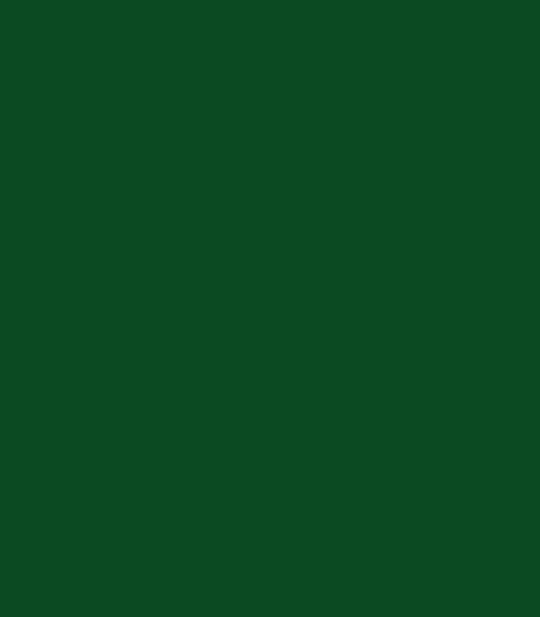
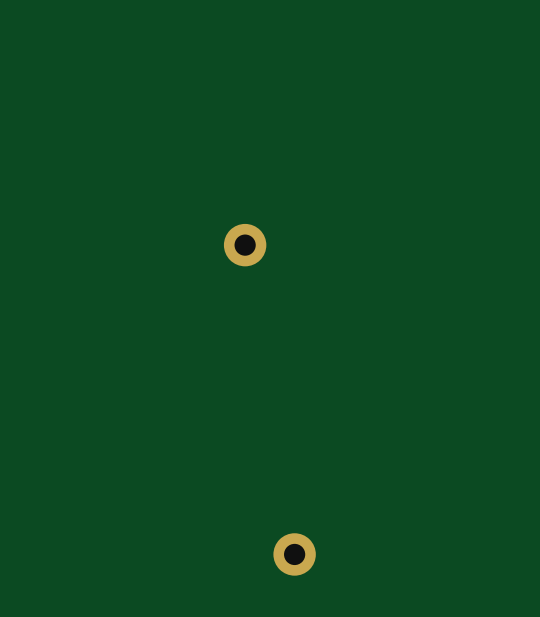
via: none -> (245, 245)
via: none -> (294, 554)

